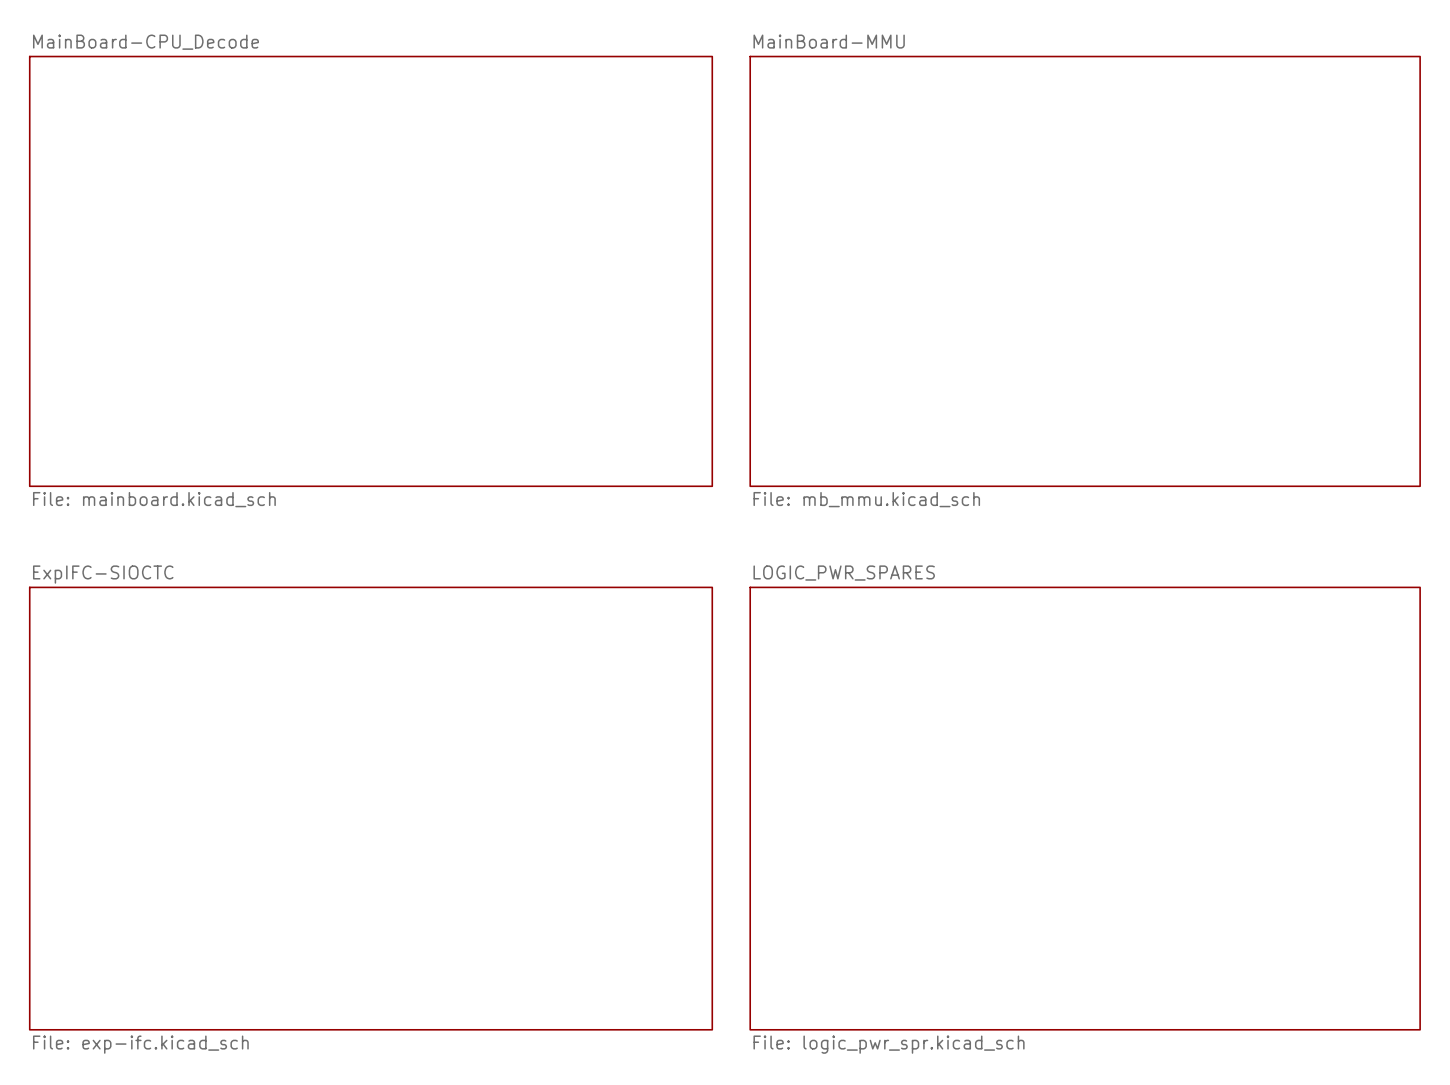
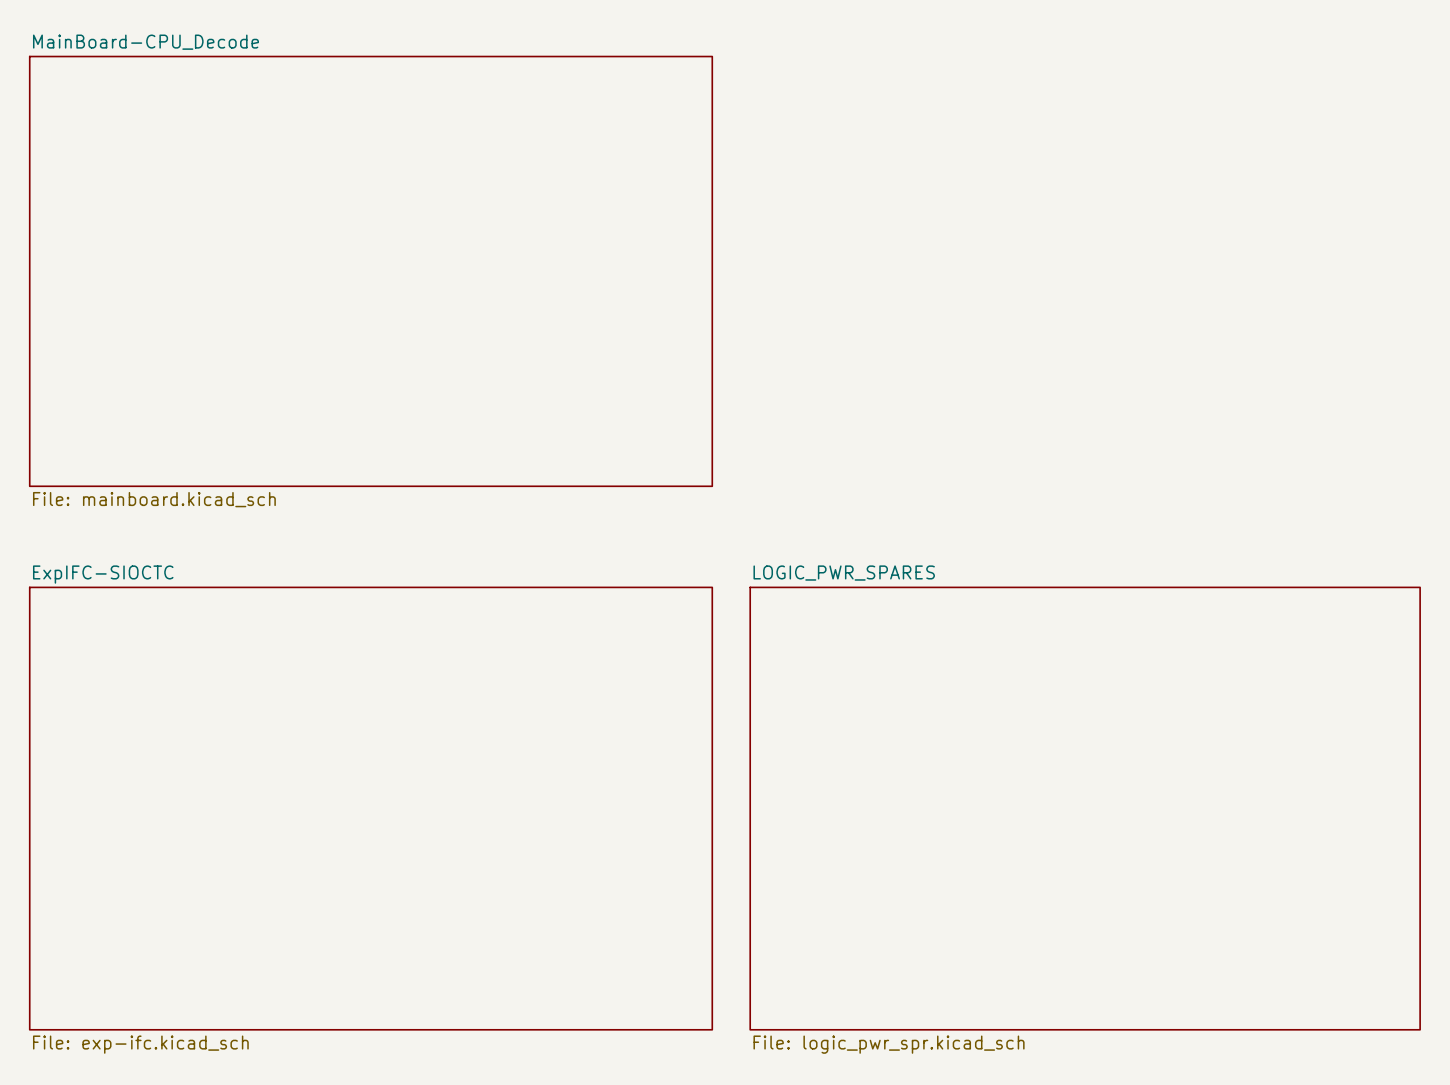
sheet MainBoard-MMU: File: mb_mmu.kicad_sch (1085, 271) -> none

